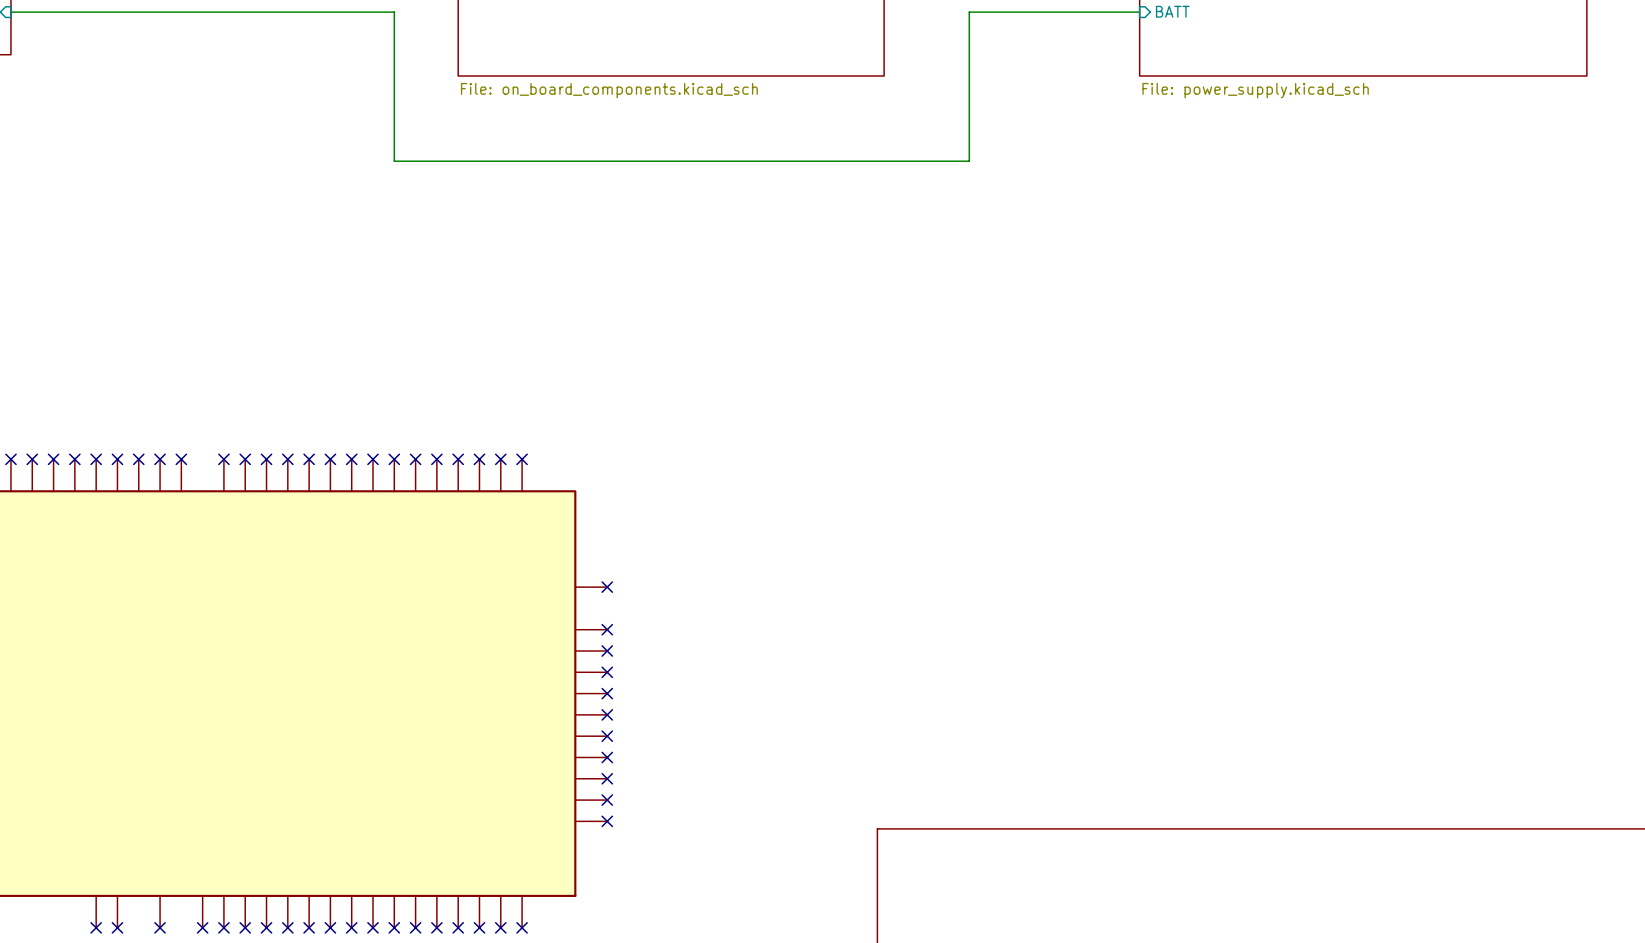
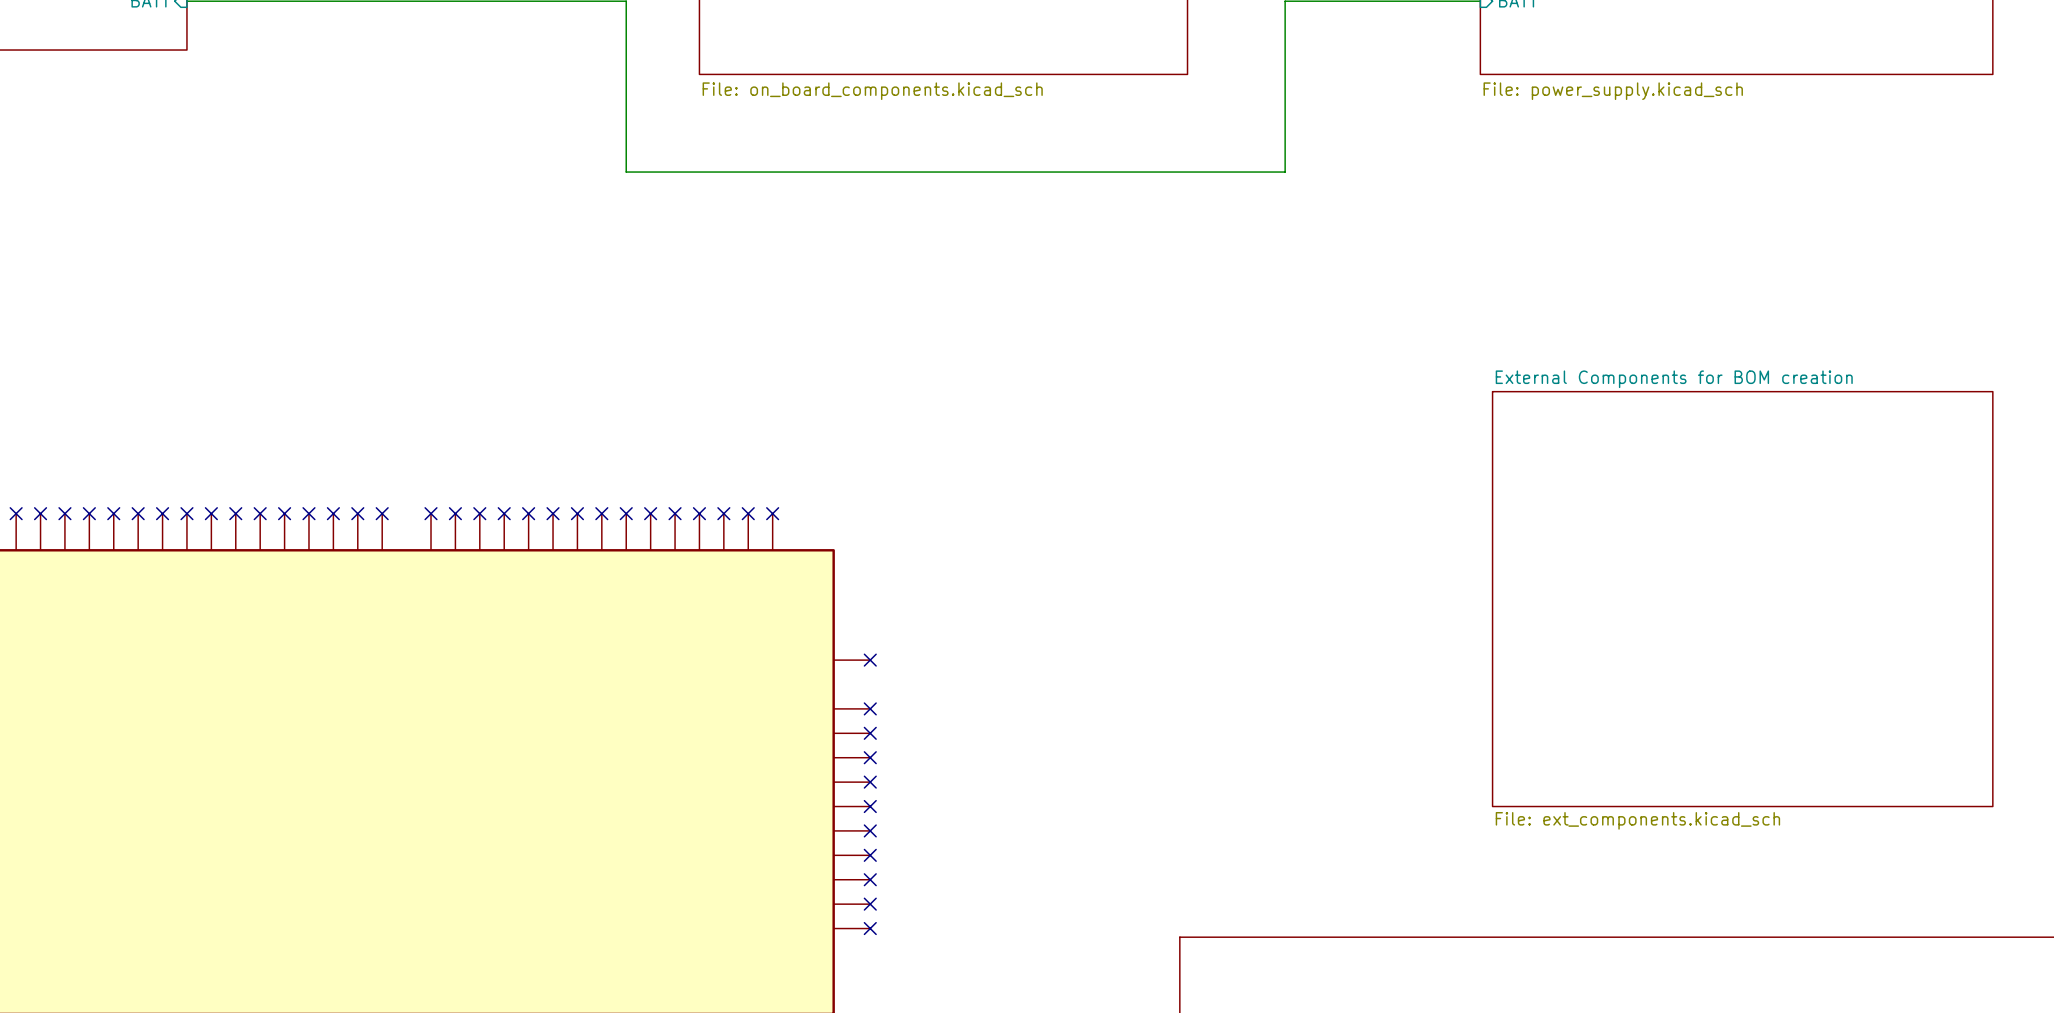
sheet External Components for BOM creation: none -> File: ext_components.kicad_sch (1742, 599)

